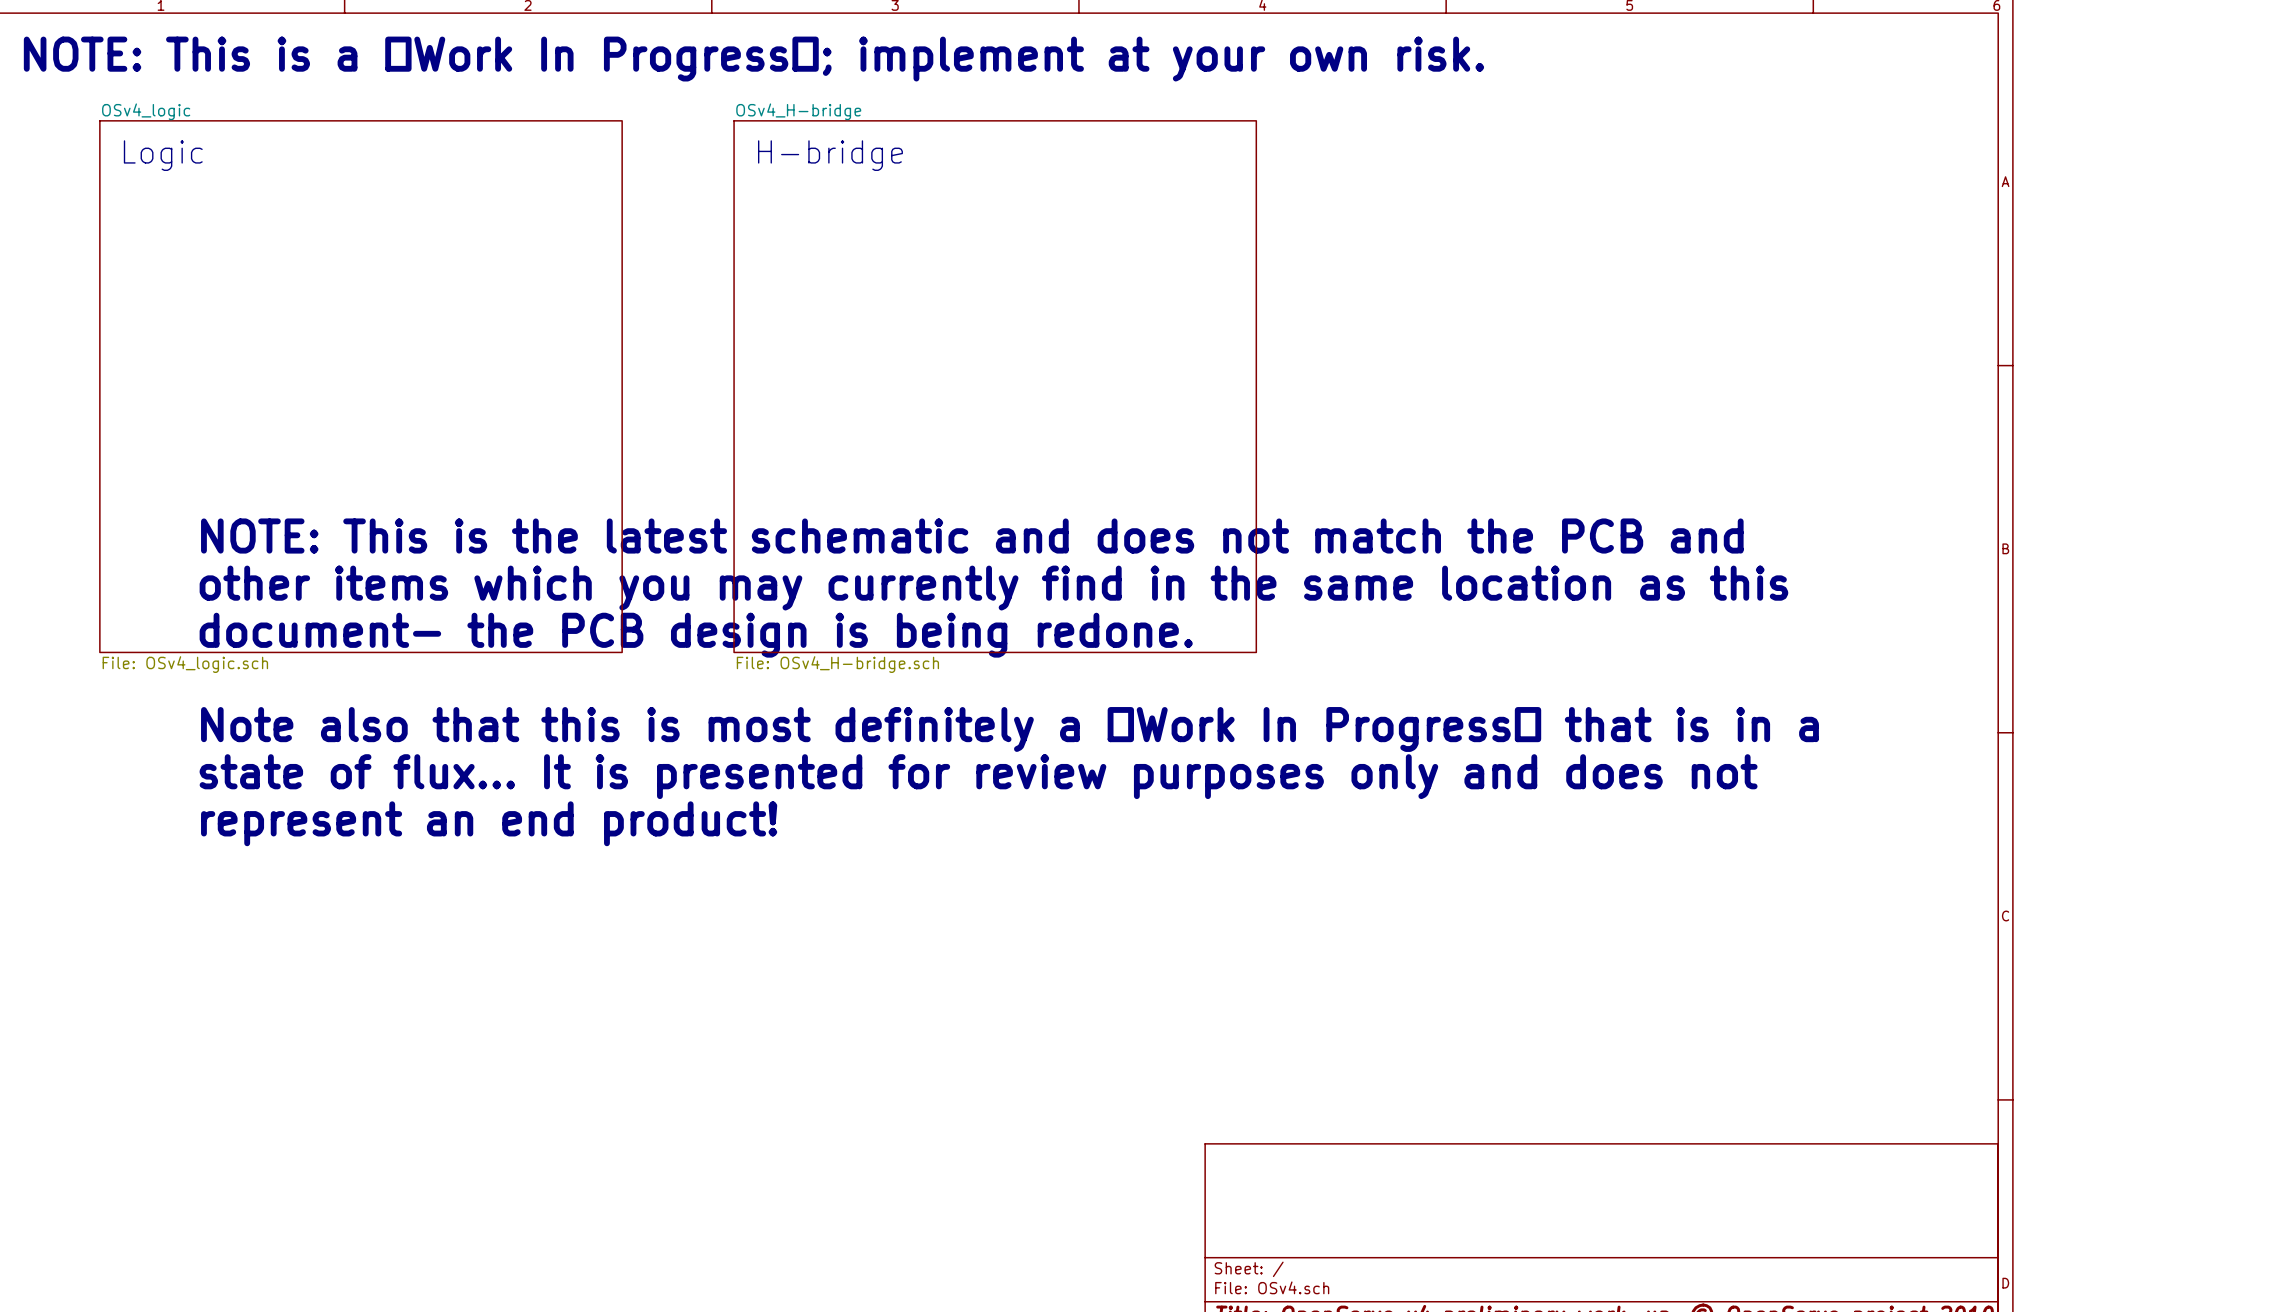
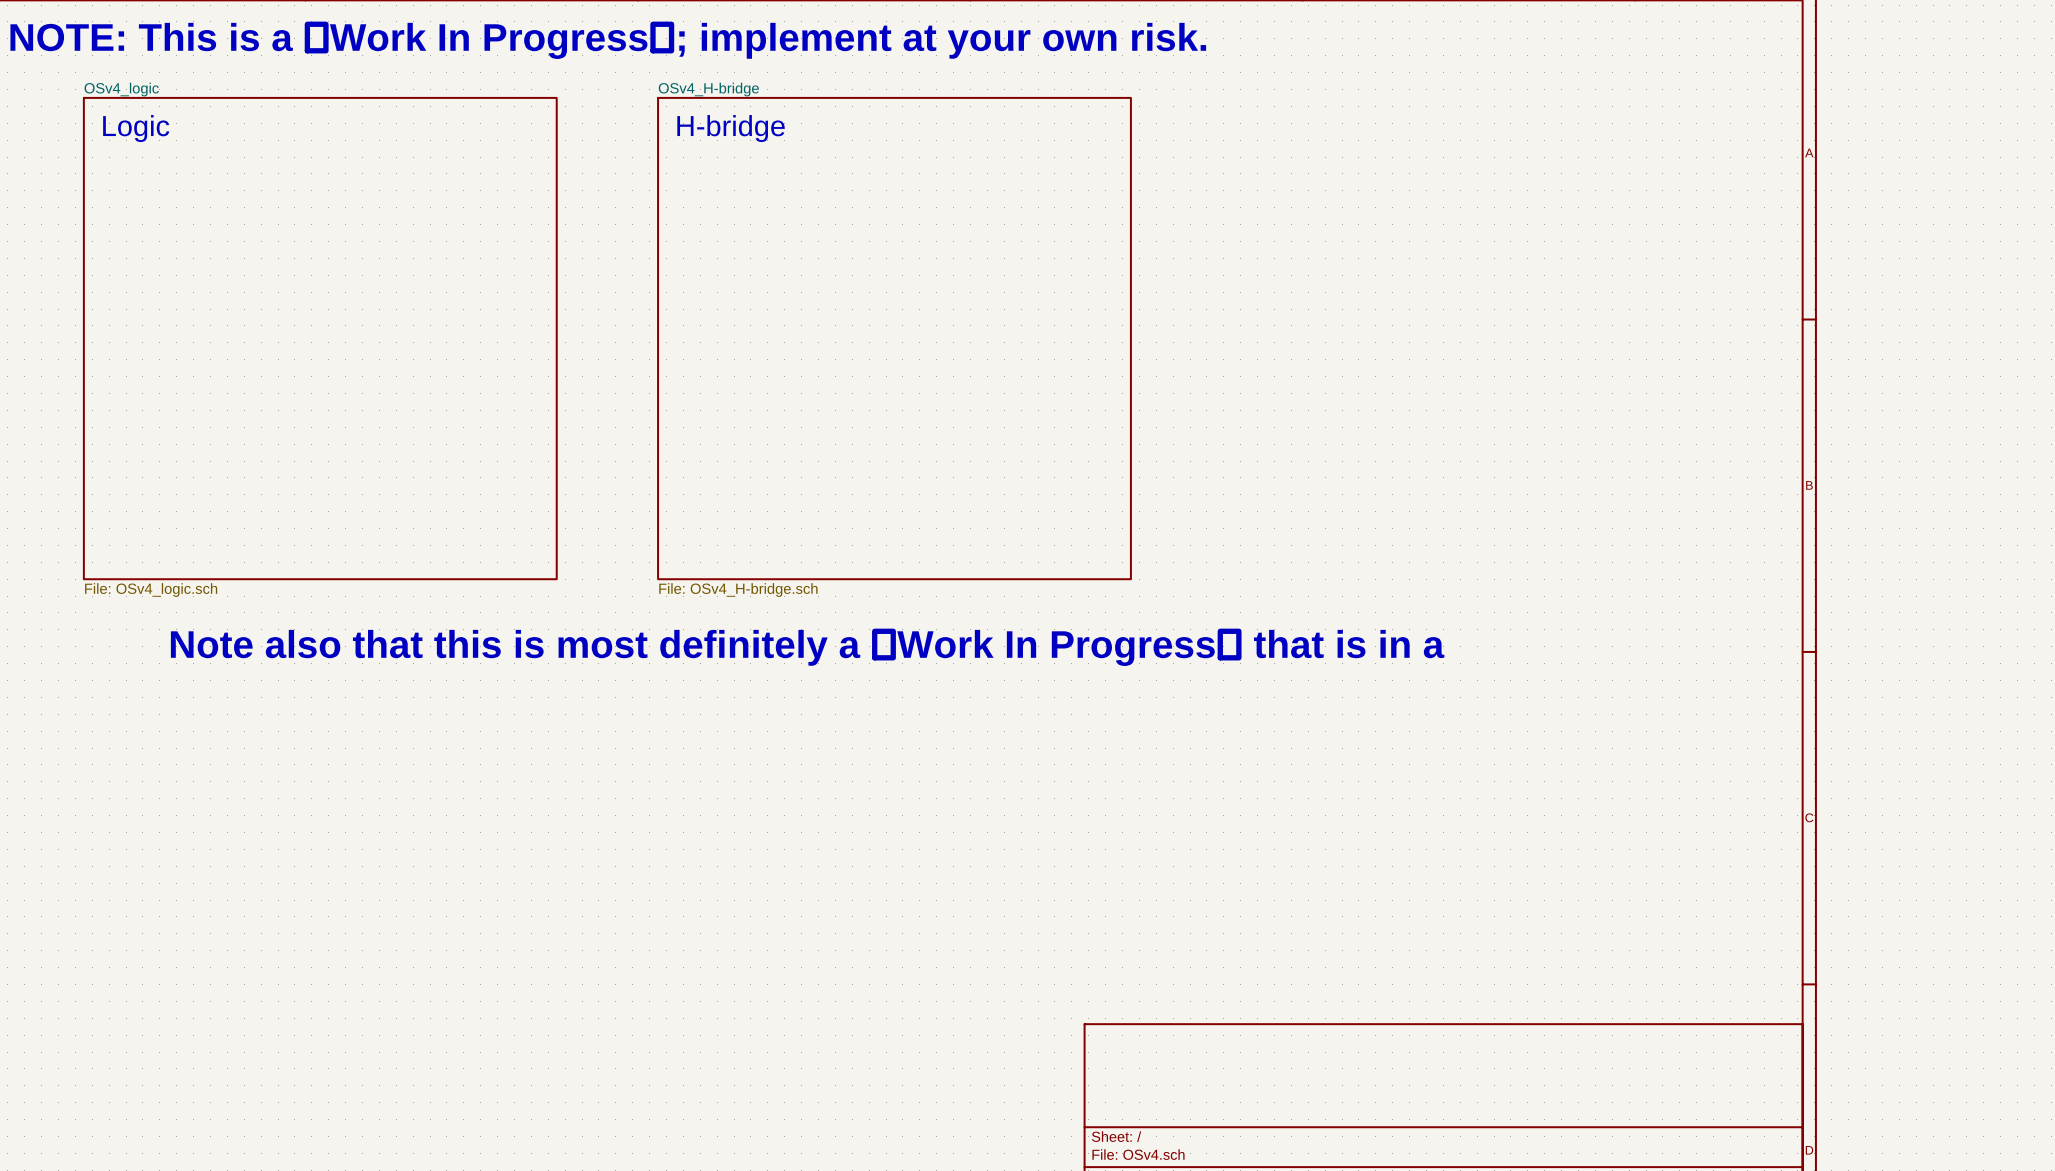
text: NOTE: This is the latest schematic and does not match the PCB and (972, 536) -> none
text: other items which you may currently find in the same location as this (993, 588) -> none
text: document- the PCB design is being redone. (696, 635) -> none
text: state of flux... It is presented for review purposes only and does not (978, 776) -> none
text: represent an end product! (489, 823) -> none

